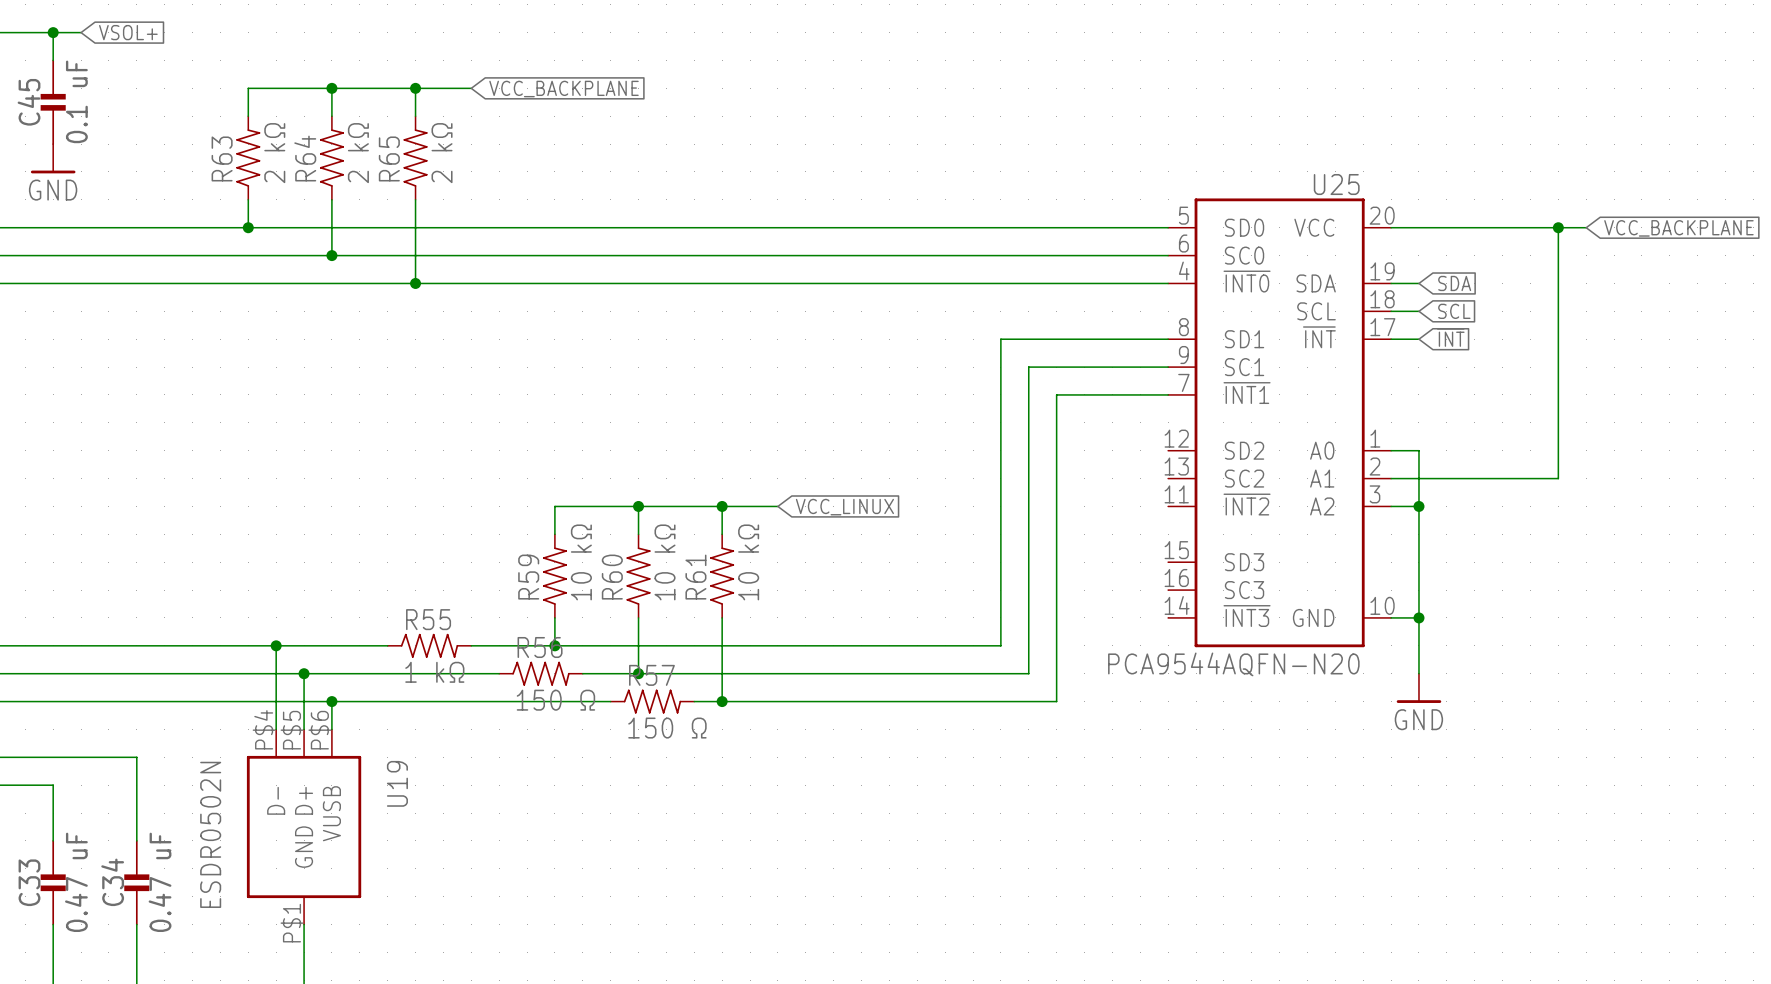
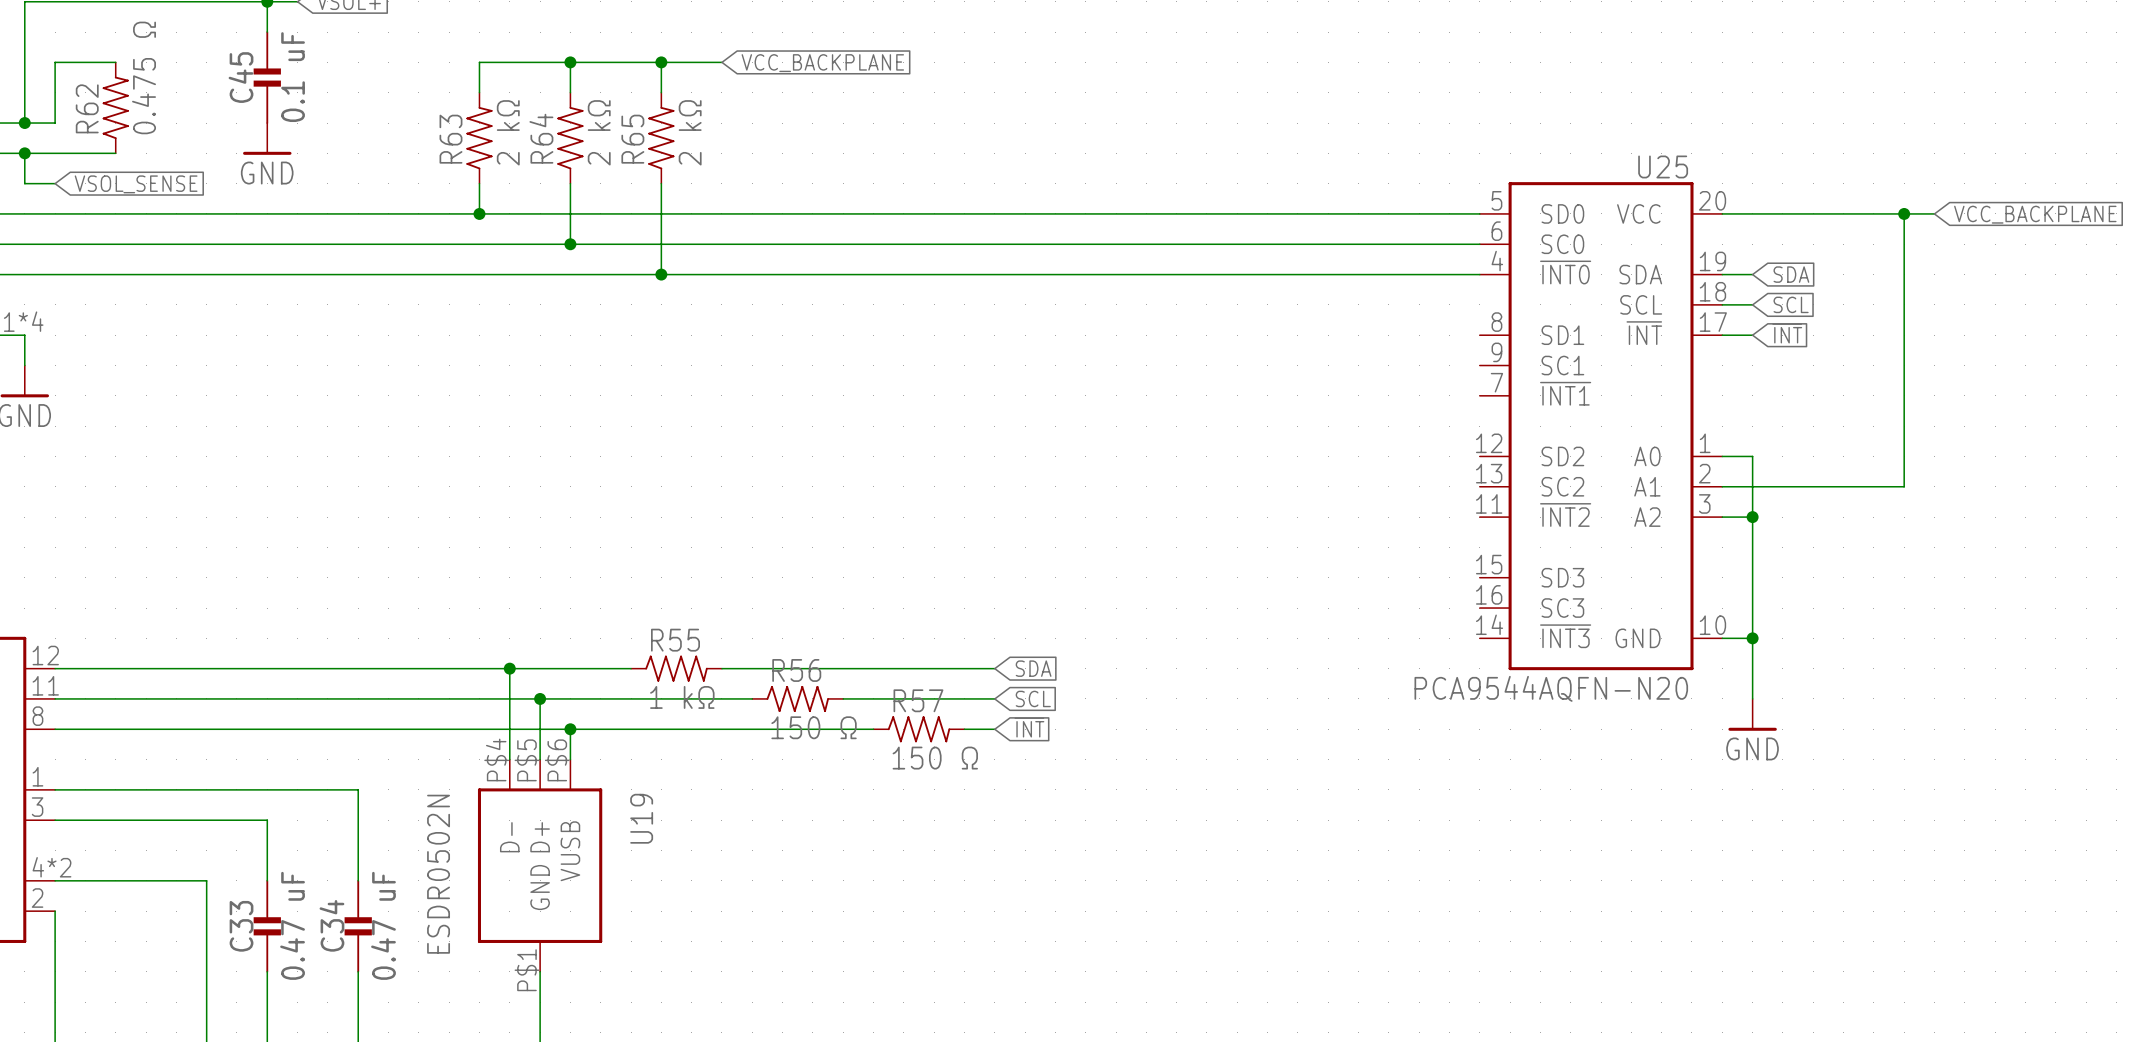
wire: (1168, 339) (1000, 339) (1000, 645) (722, 645) -> none
wire: (1168, 367) (1028, 367) (1028, 673) (722, 673) -> none
wire: (1168, 394) (1056, 394) (1056, 701) (722, 701) (722, 617) -> none
wire: (638, 506) (638, 534) -> none
junction: (638, 506) -> none
wire: (722, 506) (722, 534) -> none
junction: (722, 506) -> none
wire: (777, 506) (554, 506) (554, 534) -> none
global label: VCC_LINUX (844, 507) -> none
R59: 10 kΩ (554, 576) -> none
R60: 10 kΩ (638, 576) -> none
R61: 10 kΩ (722, 576) -> none
wire: (554, 617) (554, 645) -> none
wire: (638, 617) (638, 673) -> none
junction: (554, 645) -> none
global label: none -> SDA (1033, 668)
junction: (638, 673) -> none
global label: none -> SCL (1033, 698)
global label: none -> ~{INT} (1029, 727)
junction: (722, 701) -> none

